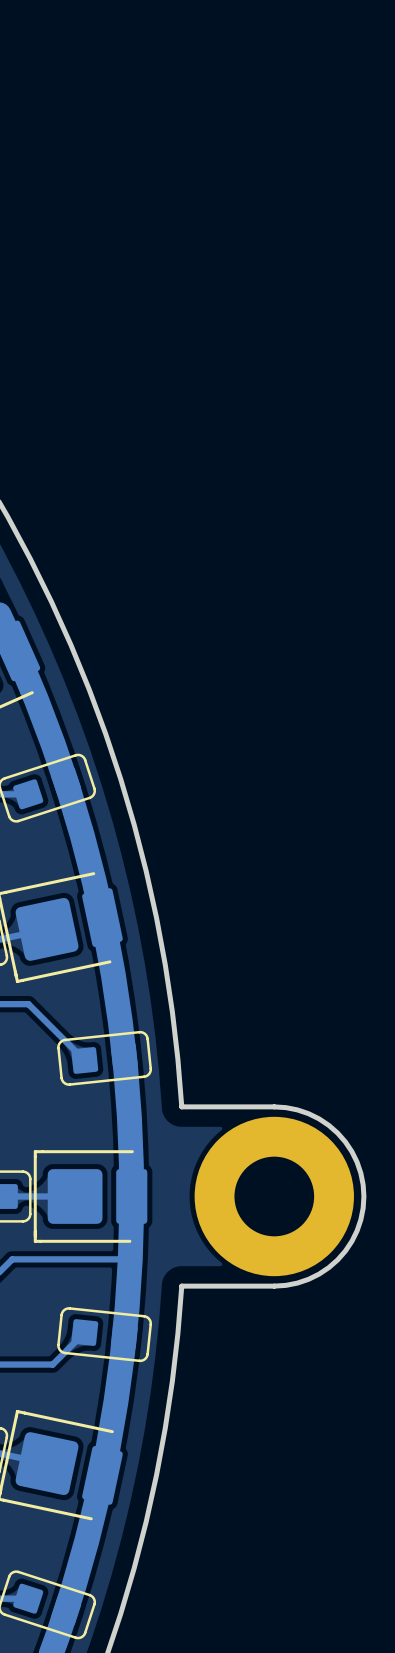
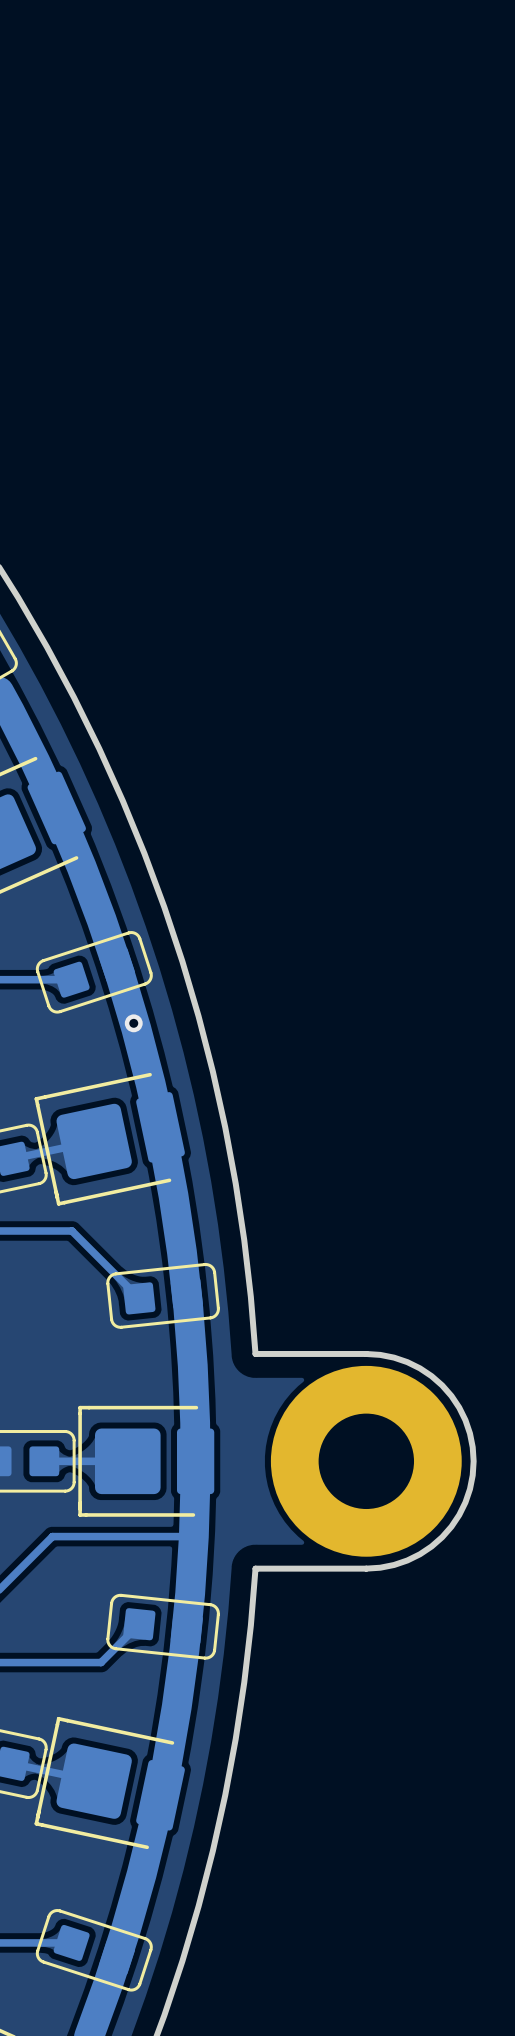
via: none -> (133, 1023)

